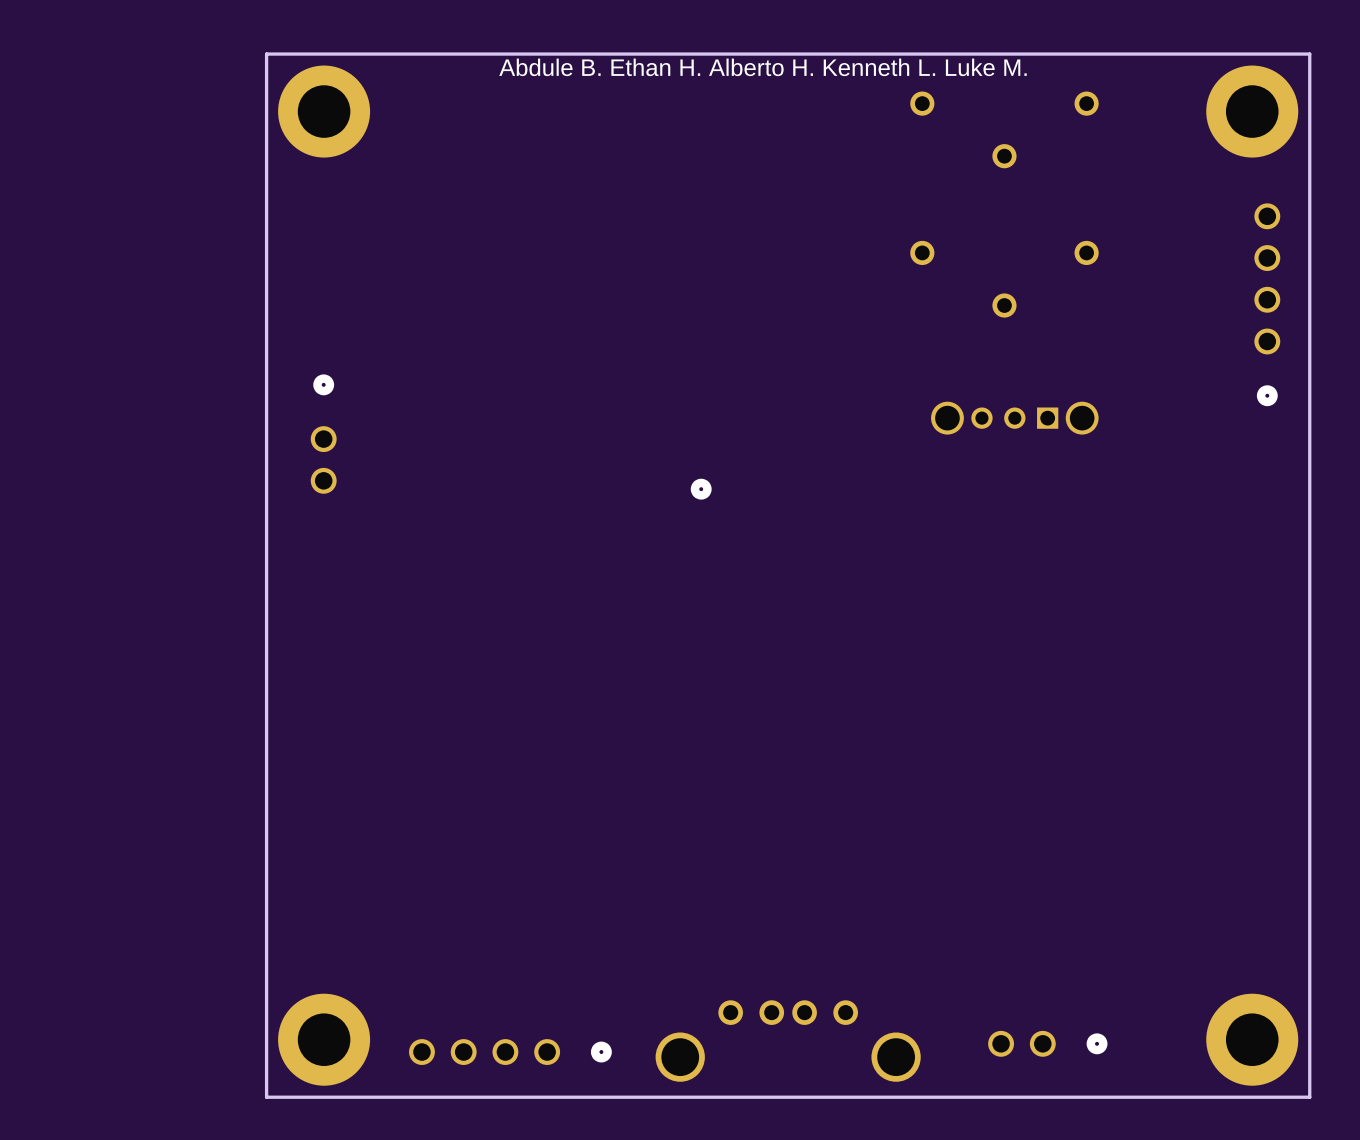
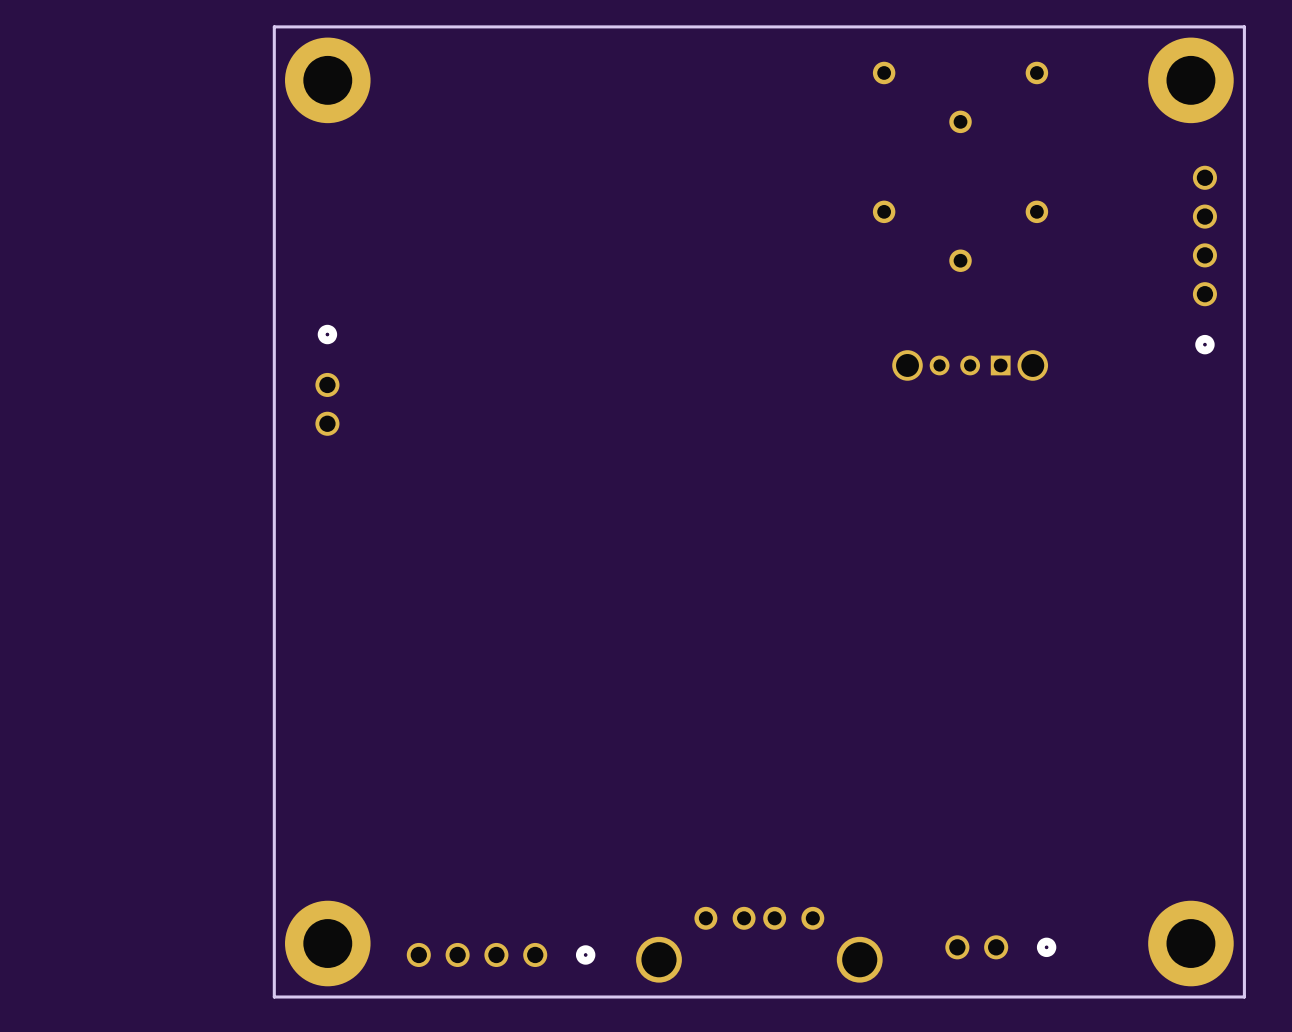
drawing: [499, 58, 1027, 77] -> none
part: (701, 489) -> none

